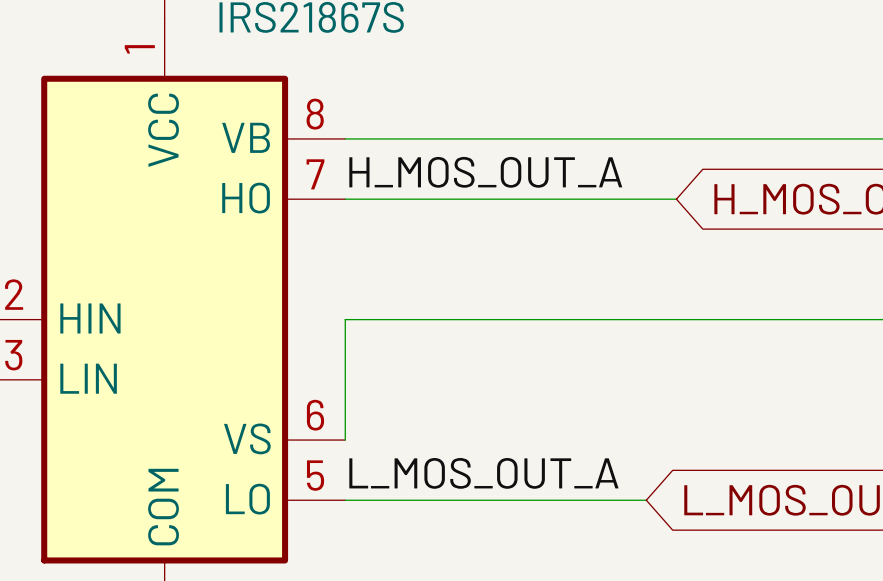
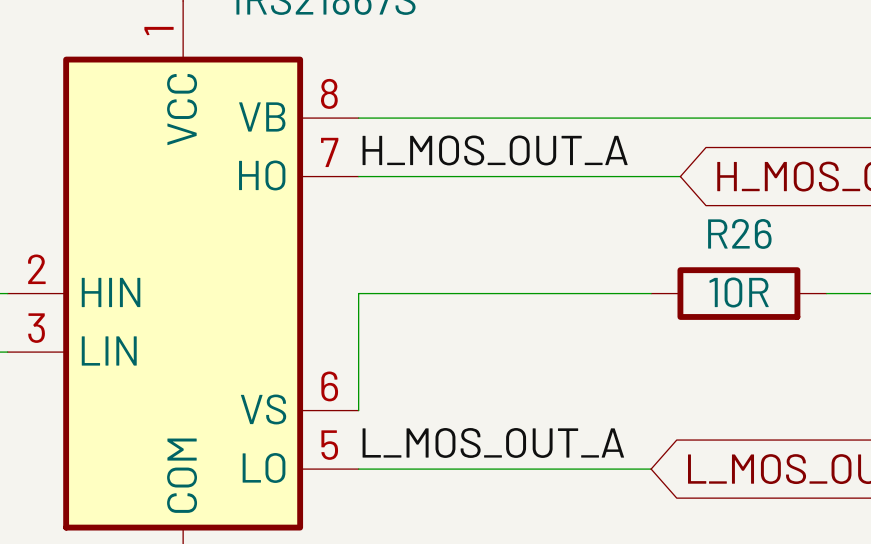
wire: (646, 319) (826, 319) -> none
R26: none -> 10R (738, 293)

